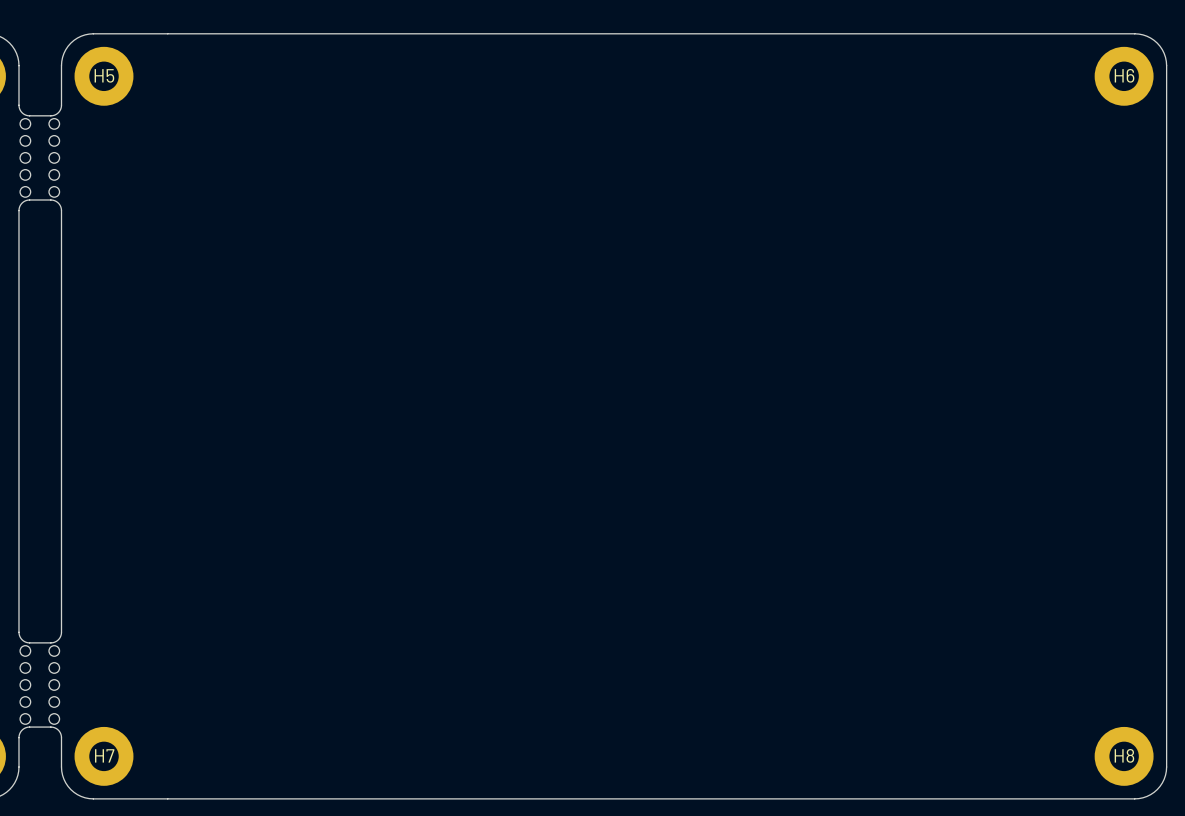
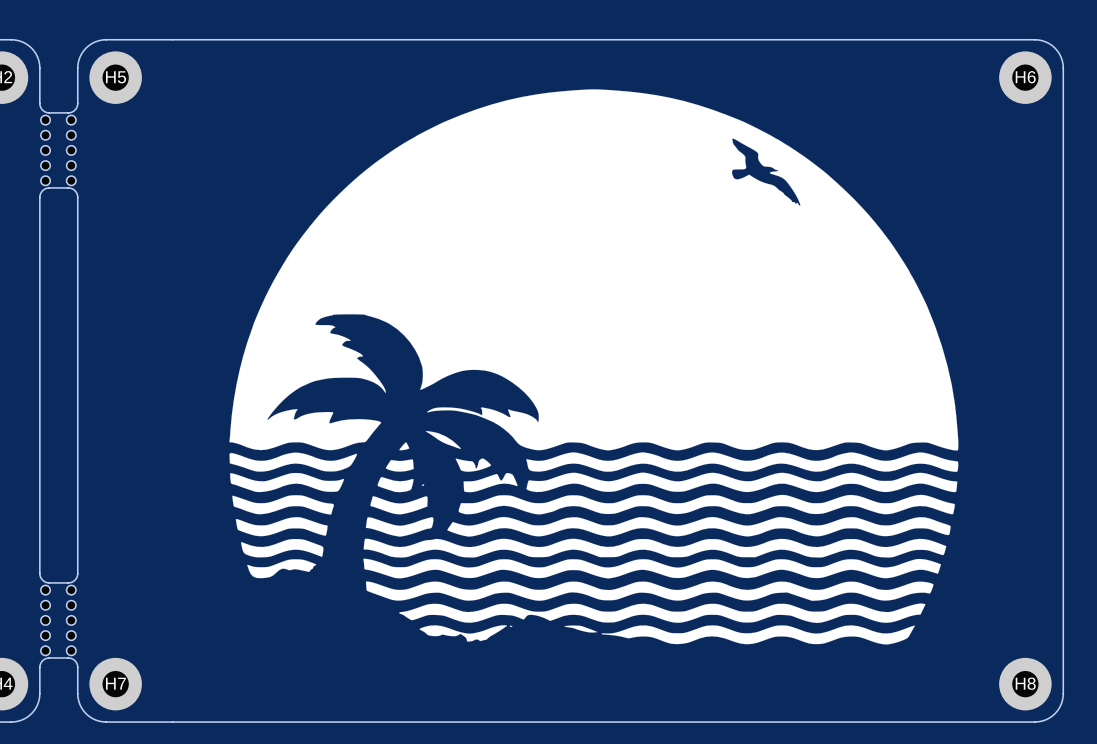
drawing: none -> [229, 89, 959, 645]

